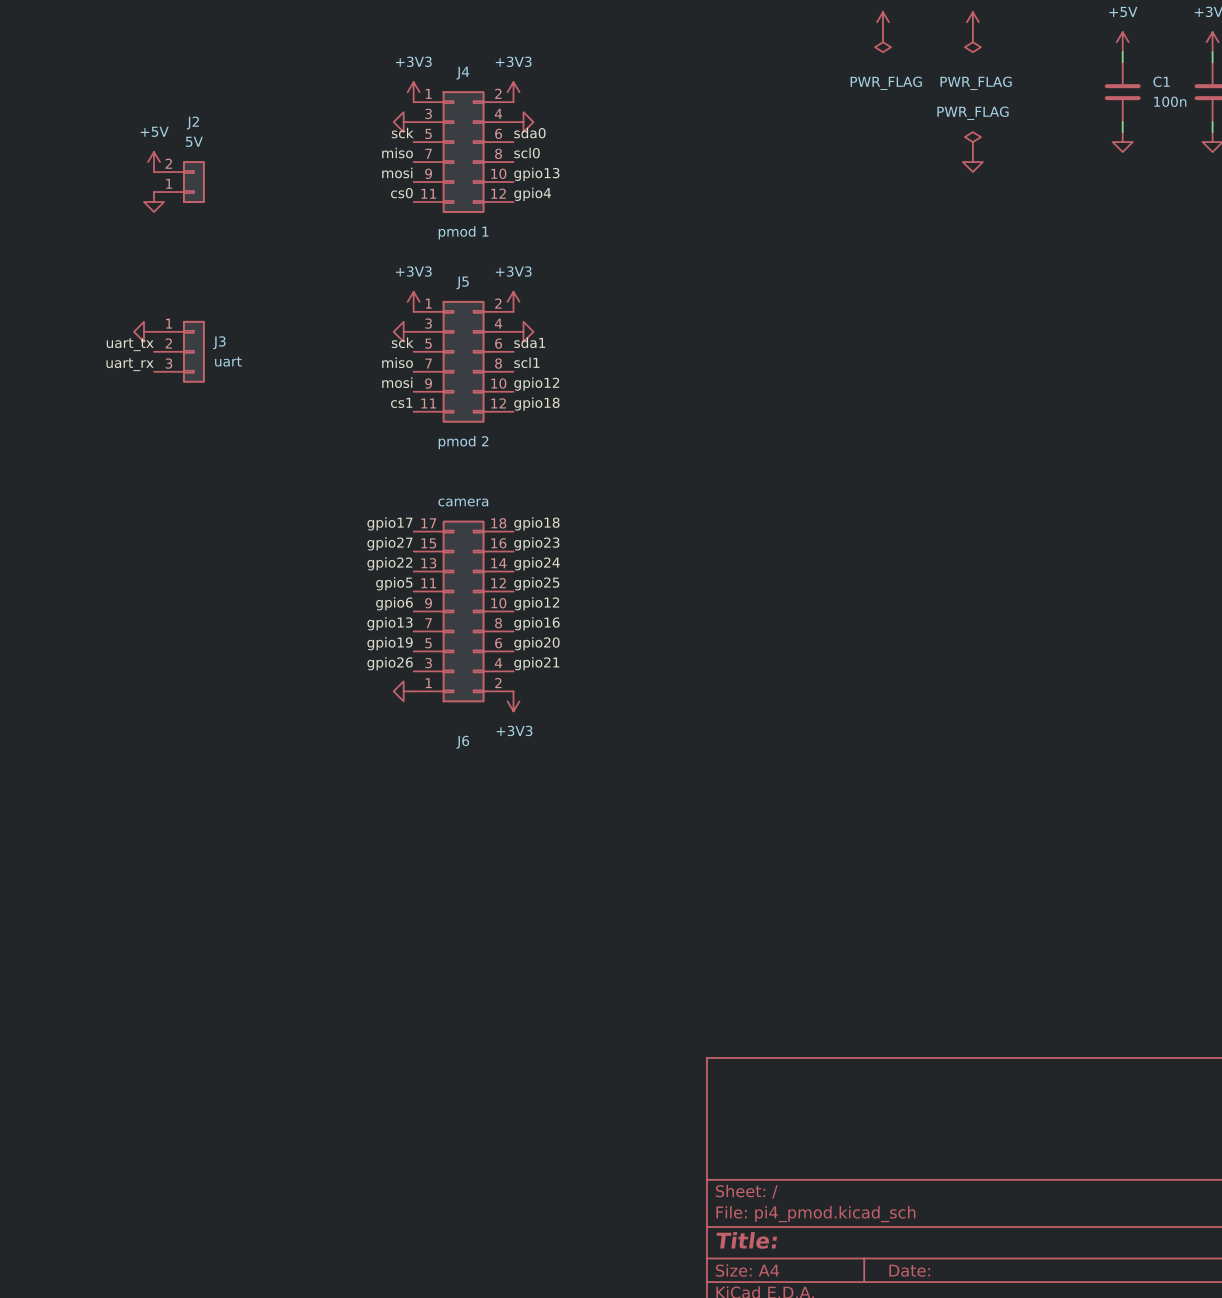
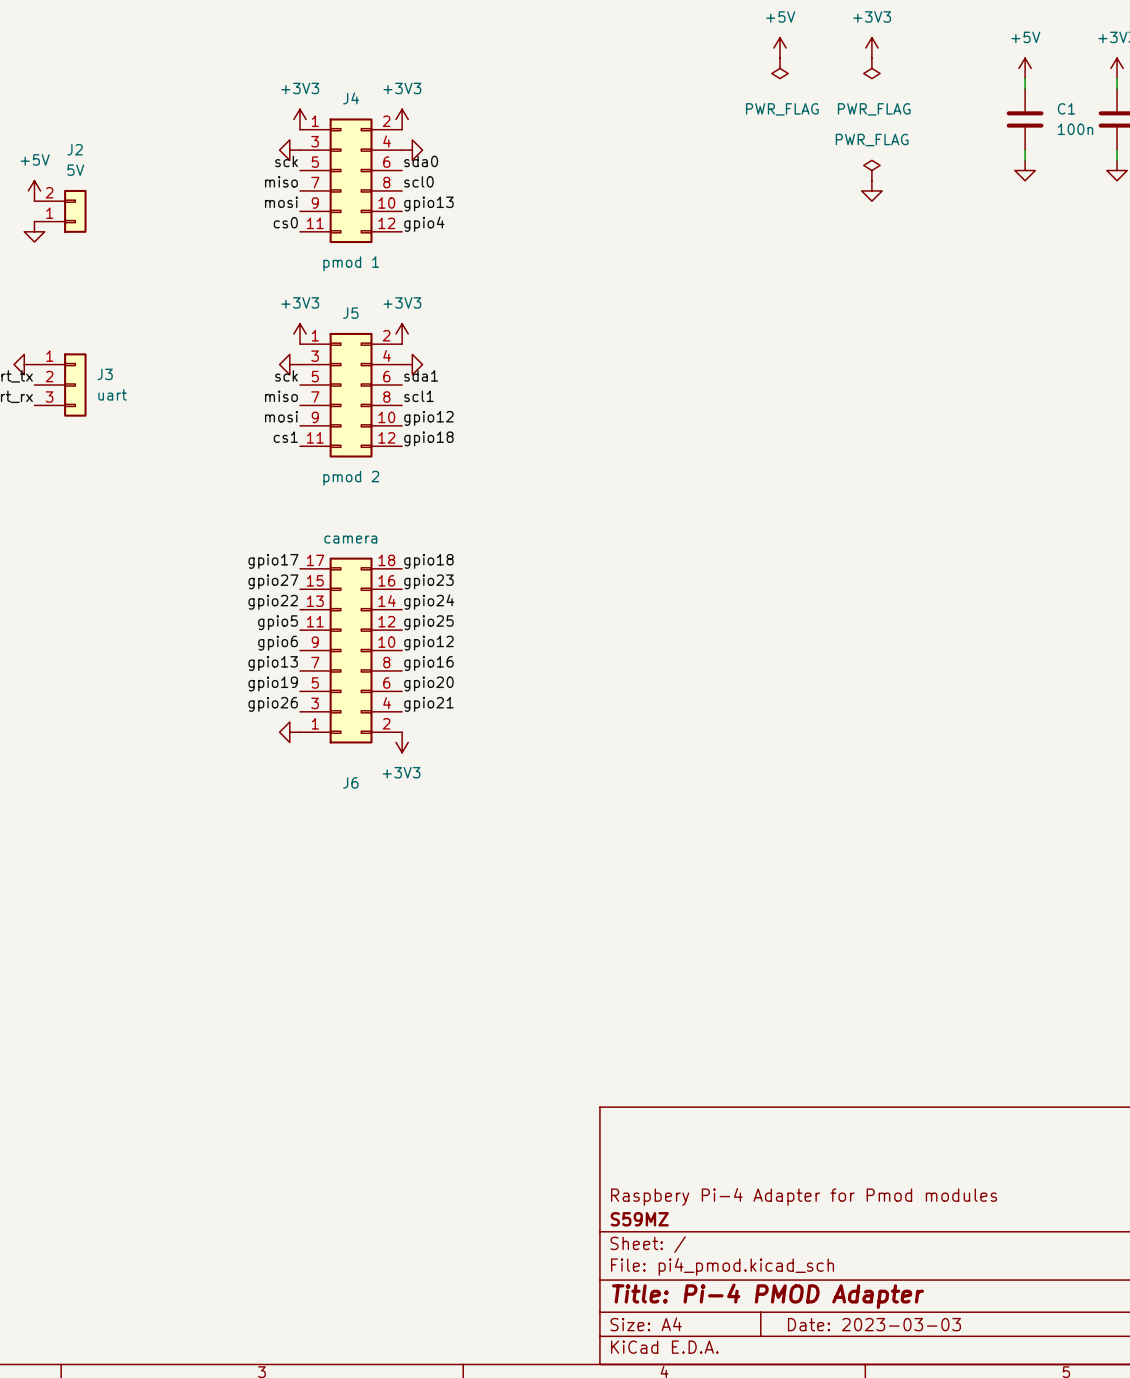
title block: none -> Raspbery Pi-4 Adapter for Pmod modules (804, 1196)
title block: none -> S59MZ (639, 1219)
title block: Title: (746, 1240) -> Title: Pi-4 PMOD Adapter (768, 1296)
title block: Date: (909, 1270) -> Date: 2023-03-03 (874, 1324)

